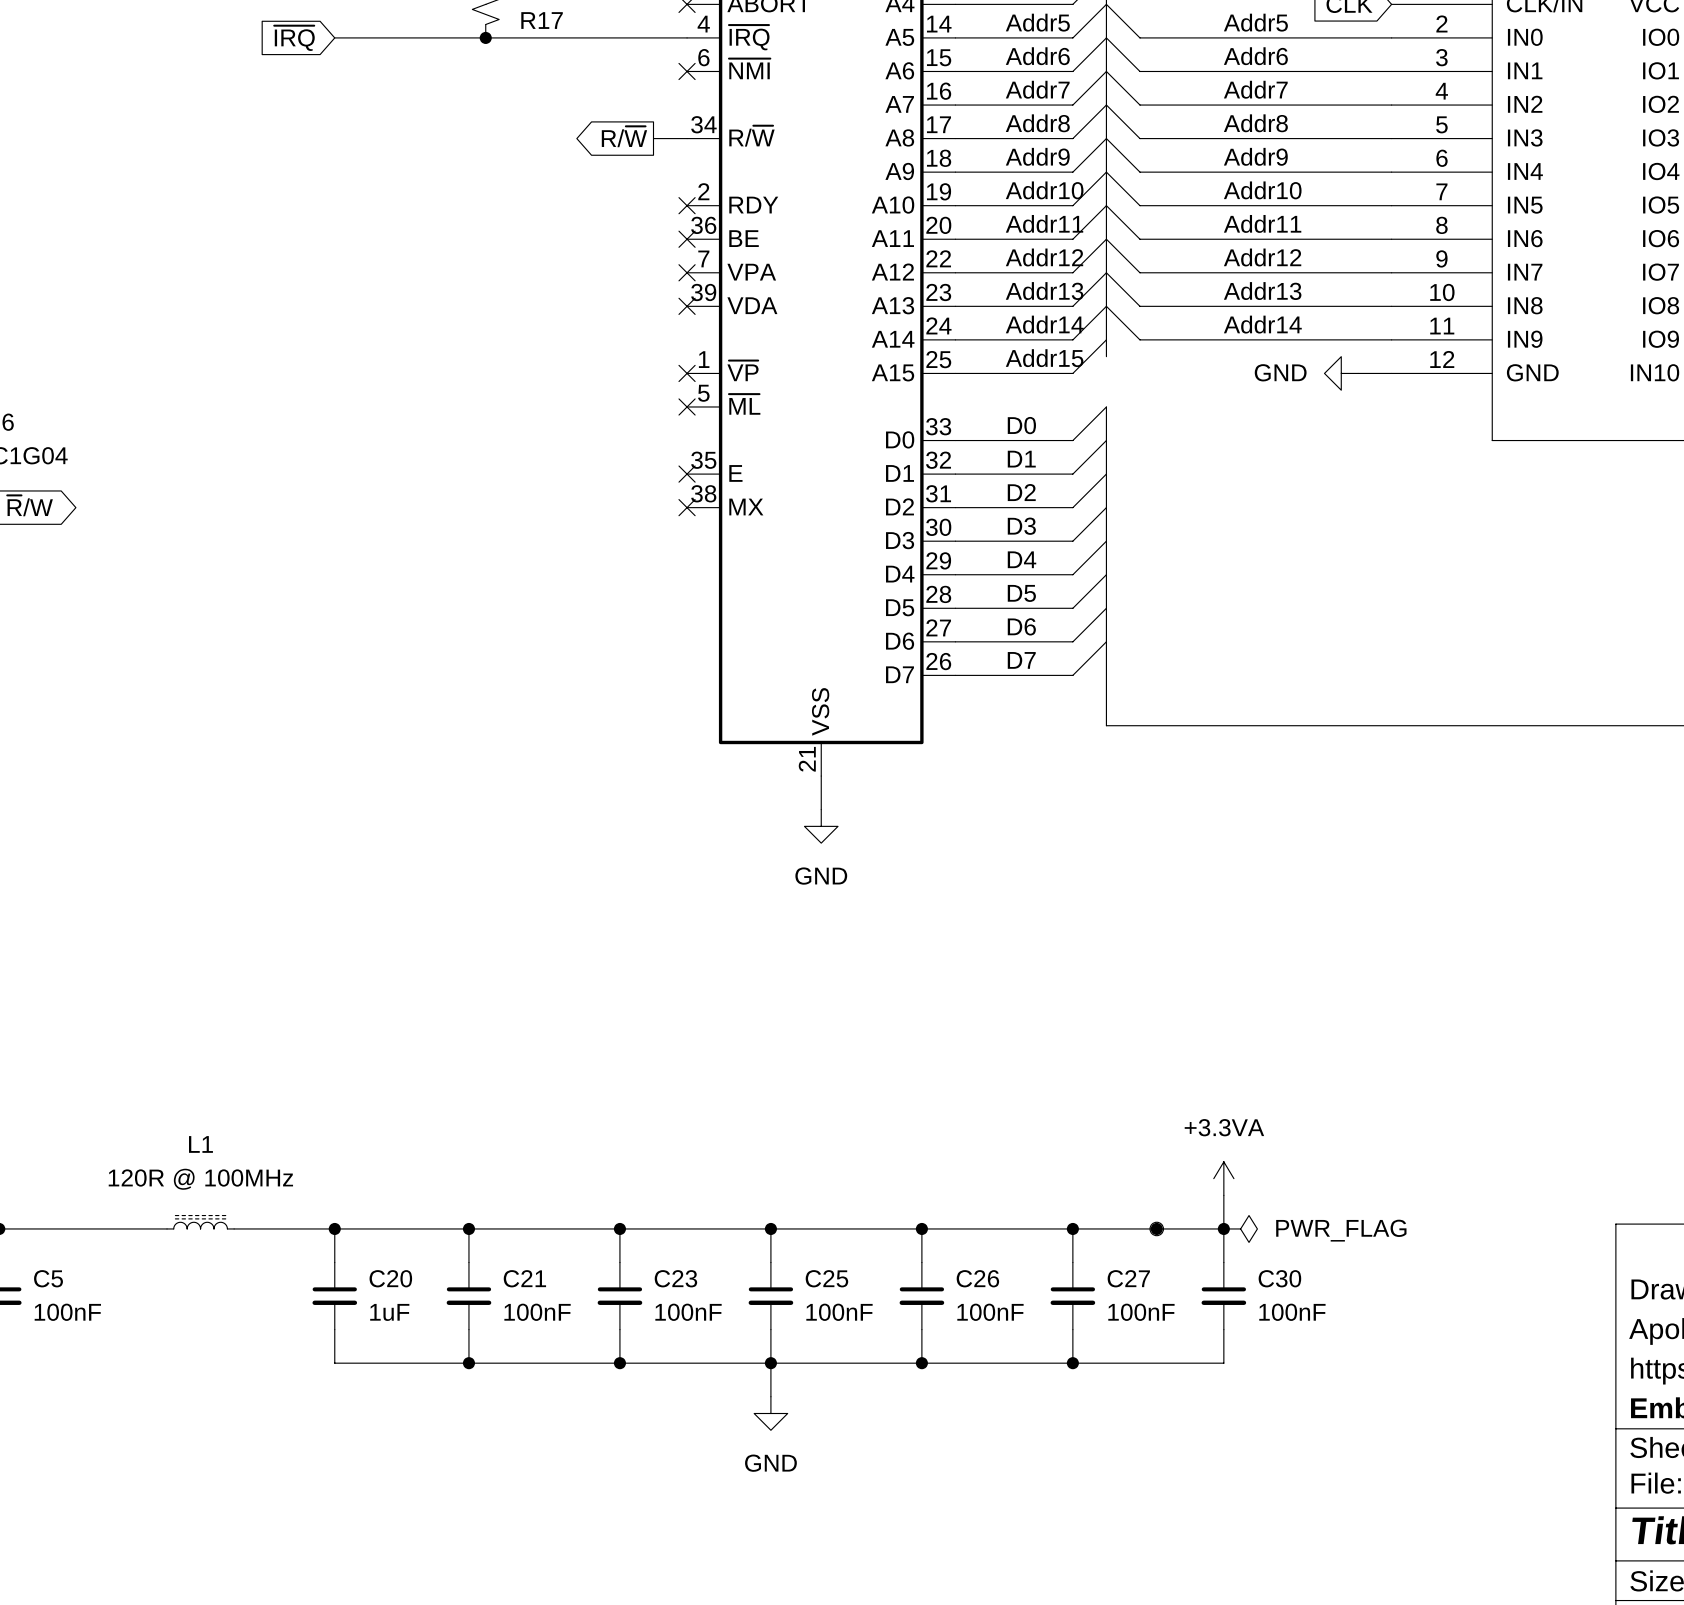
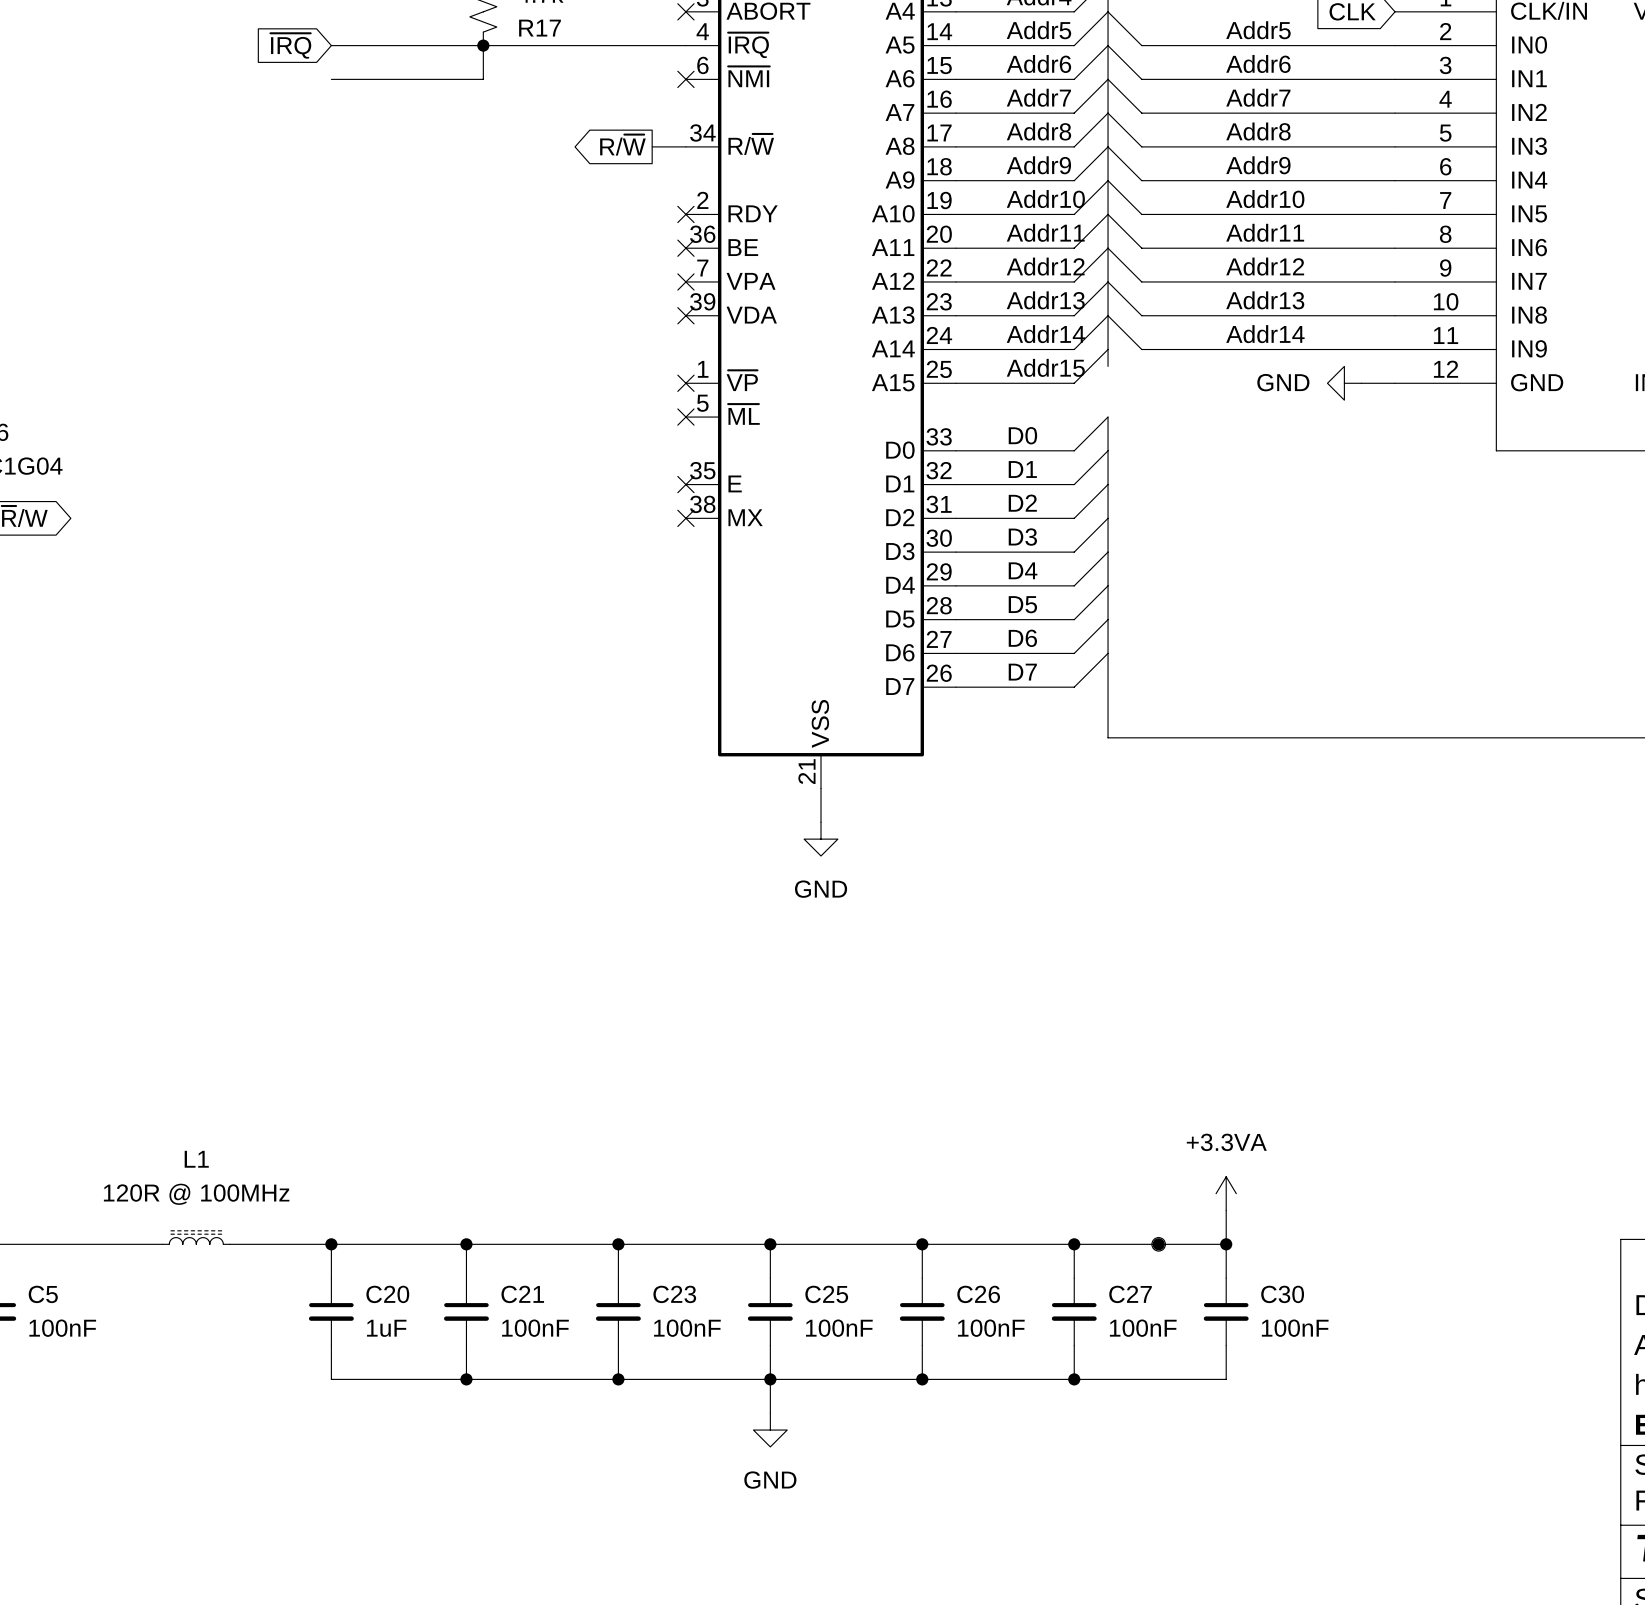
wire: none -> (483, 45) (483, 79) (331, 79)
power symbol: PWR_FLAG (1240, 1228) -> none

